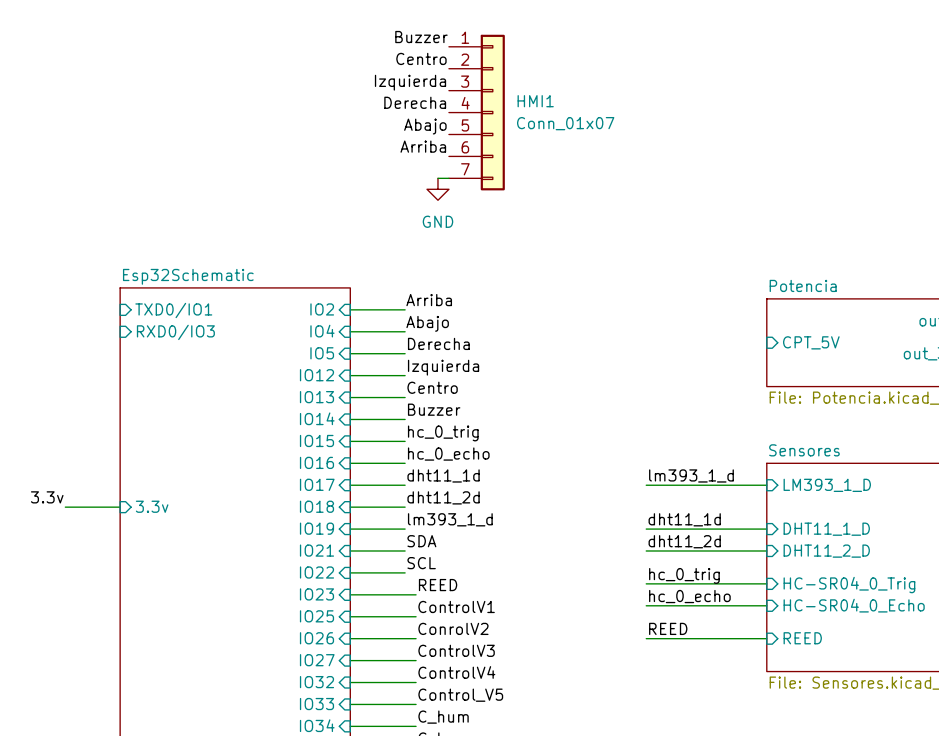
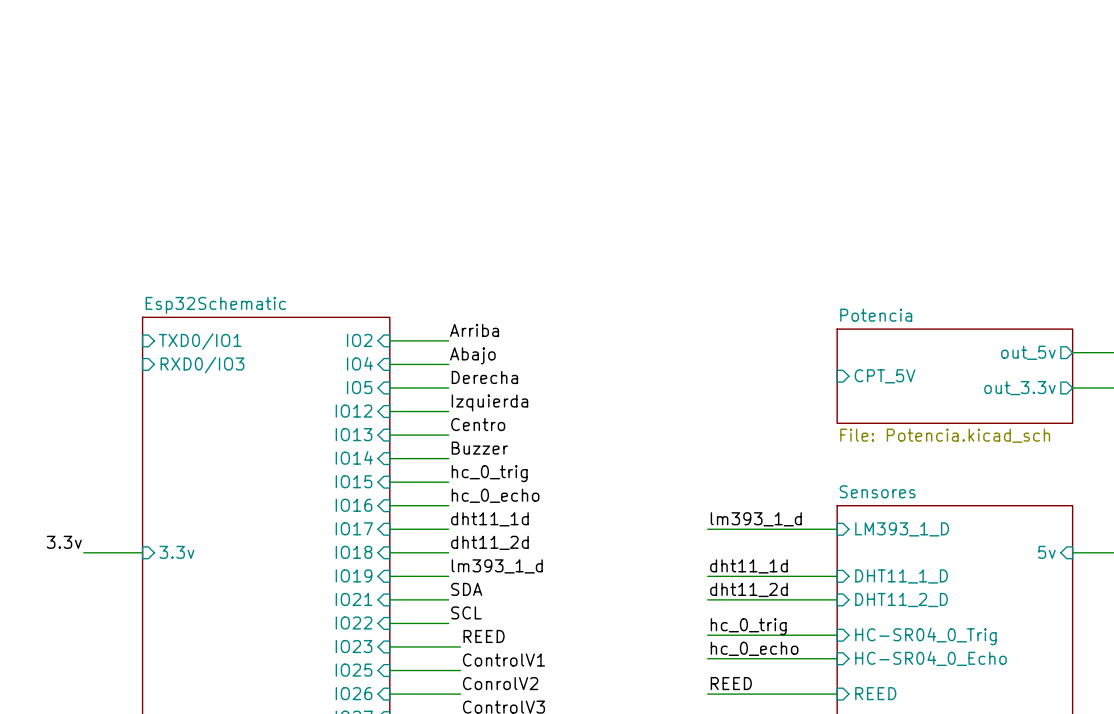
label: Buzzer (421, 37) -> none
label: Centro (421, 58) -> none
label: Izquierda (410, 82) -> none
label: Derecha (415, 102) -> none
HMI1: Conn_01x07 (476, 112) -> none
label: Abajo (425, 126) -> none
label: Arriba (423, 146) -> none
wire: (437, 178) (448, 178) -> none
power symbol: GND (437, 189) -> none

